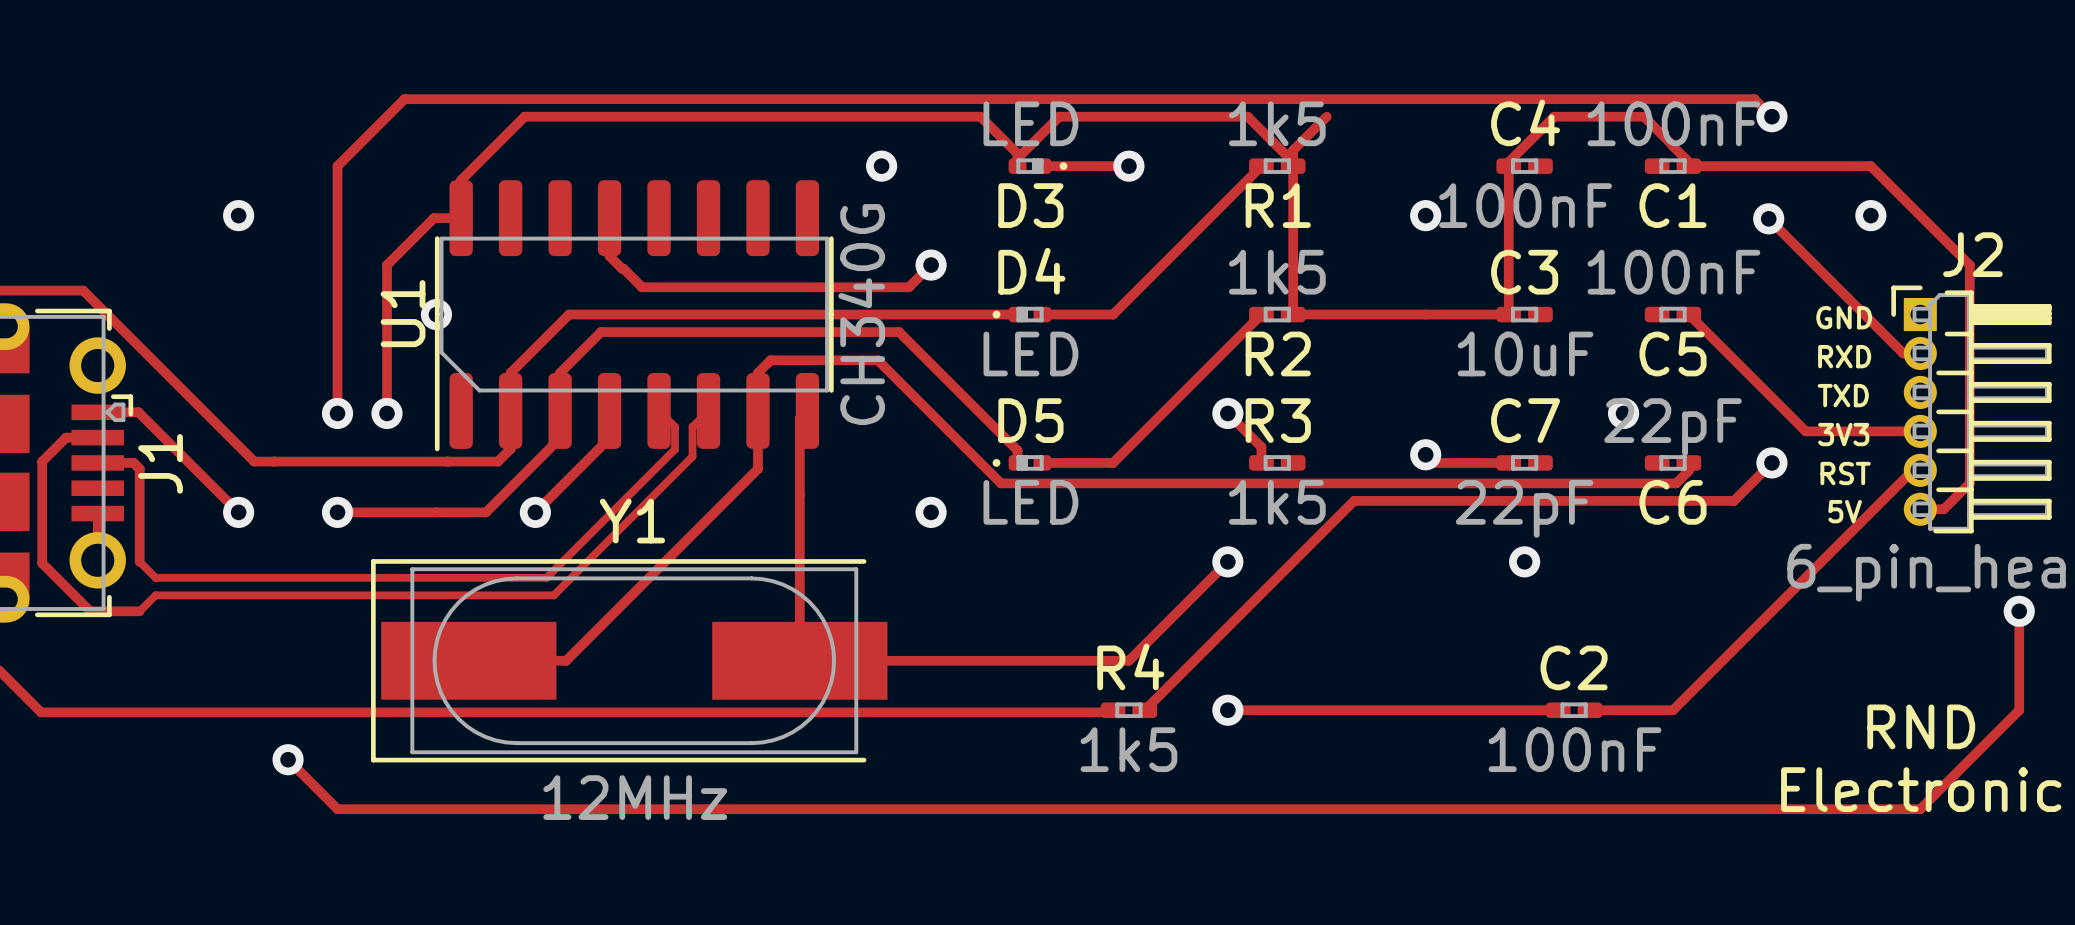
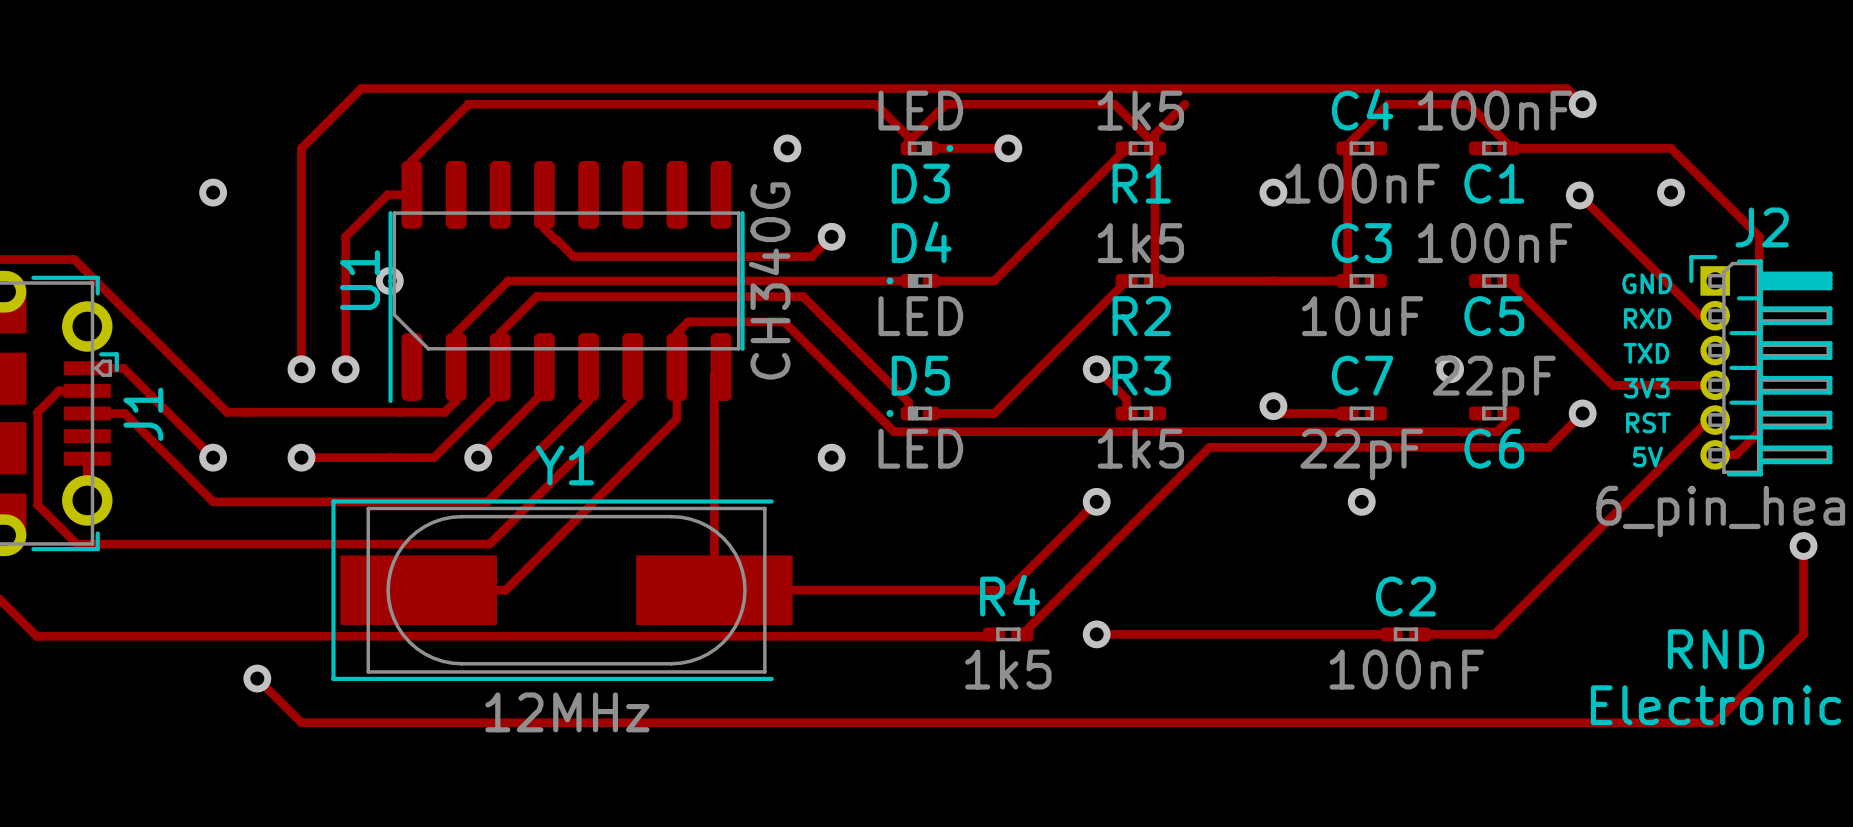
track: (659, 410) (675, 426) (675, 449) (546, 577) (155, 577) (139, 561) (139, 468) (133, 462) -> (588, 367) (588, 400) (487, 501) (213, 501) (124, 413) (119, 413)
track: (708, 410) (692, 426) (692, 456) (553, 595) (155, 595) (139, 611) (90, 611) (42, 563) -> (632, 367) (632, 400) (489, 544) (76, 544) (37, 503)

